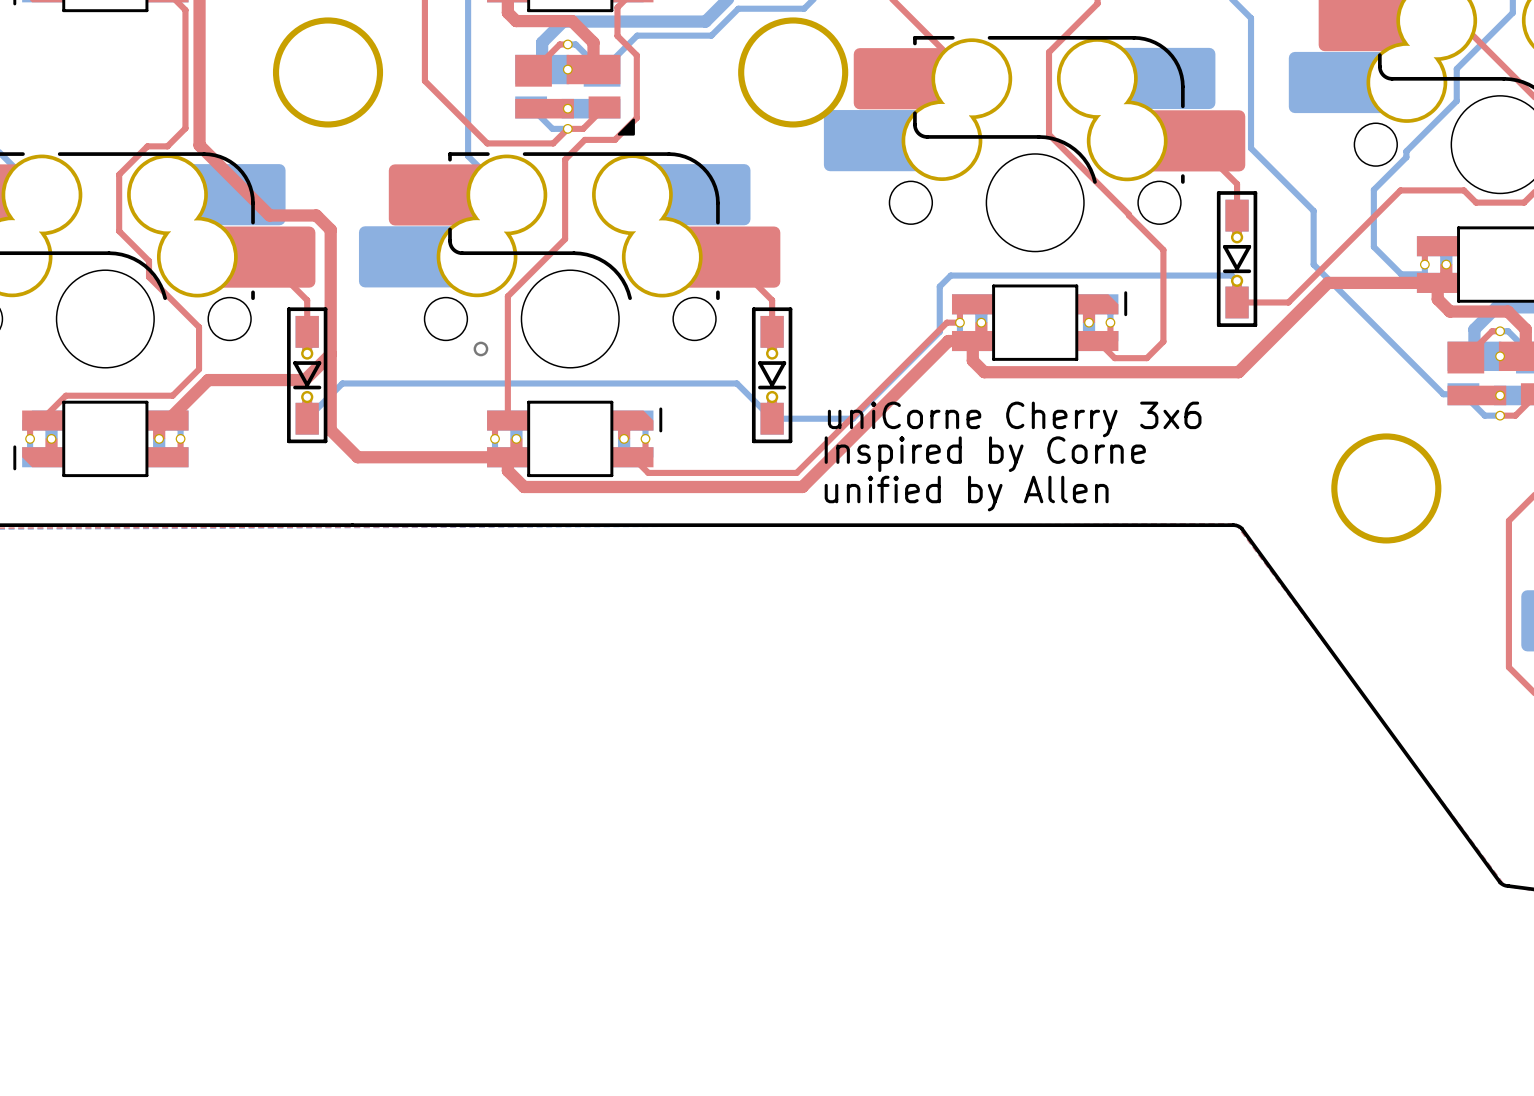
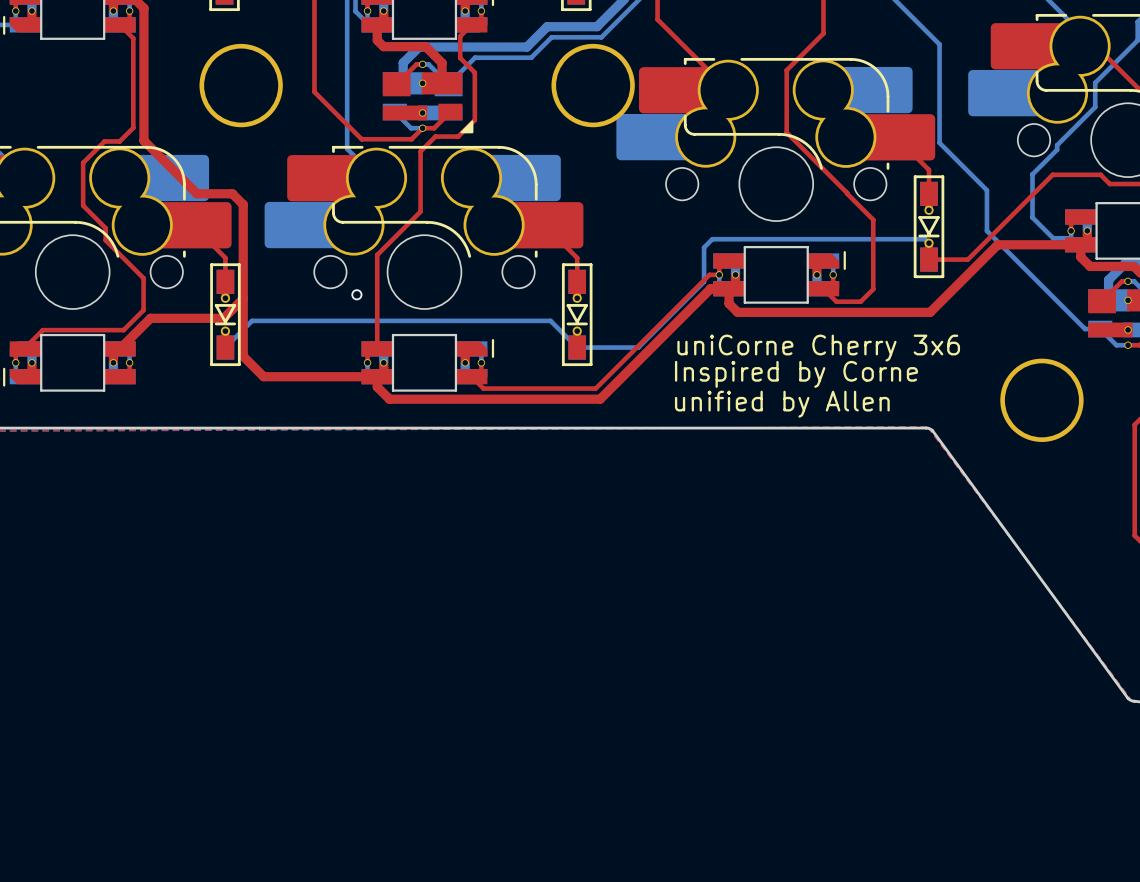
text position: uniCorne Cherry 3x6 (1014, 419) -> uniCorne Cherry 3x6 (818, 348)
text position: Inspired by Corne (985, 454) -> Inspired by Corne (796, 374)
text position: unified by Allen (966, 493) -> unified by Allen (782, 404)

